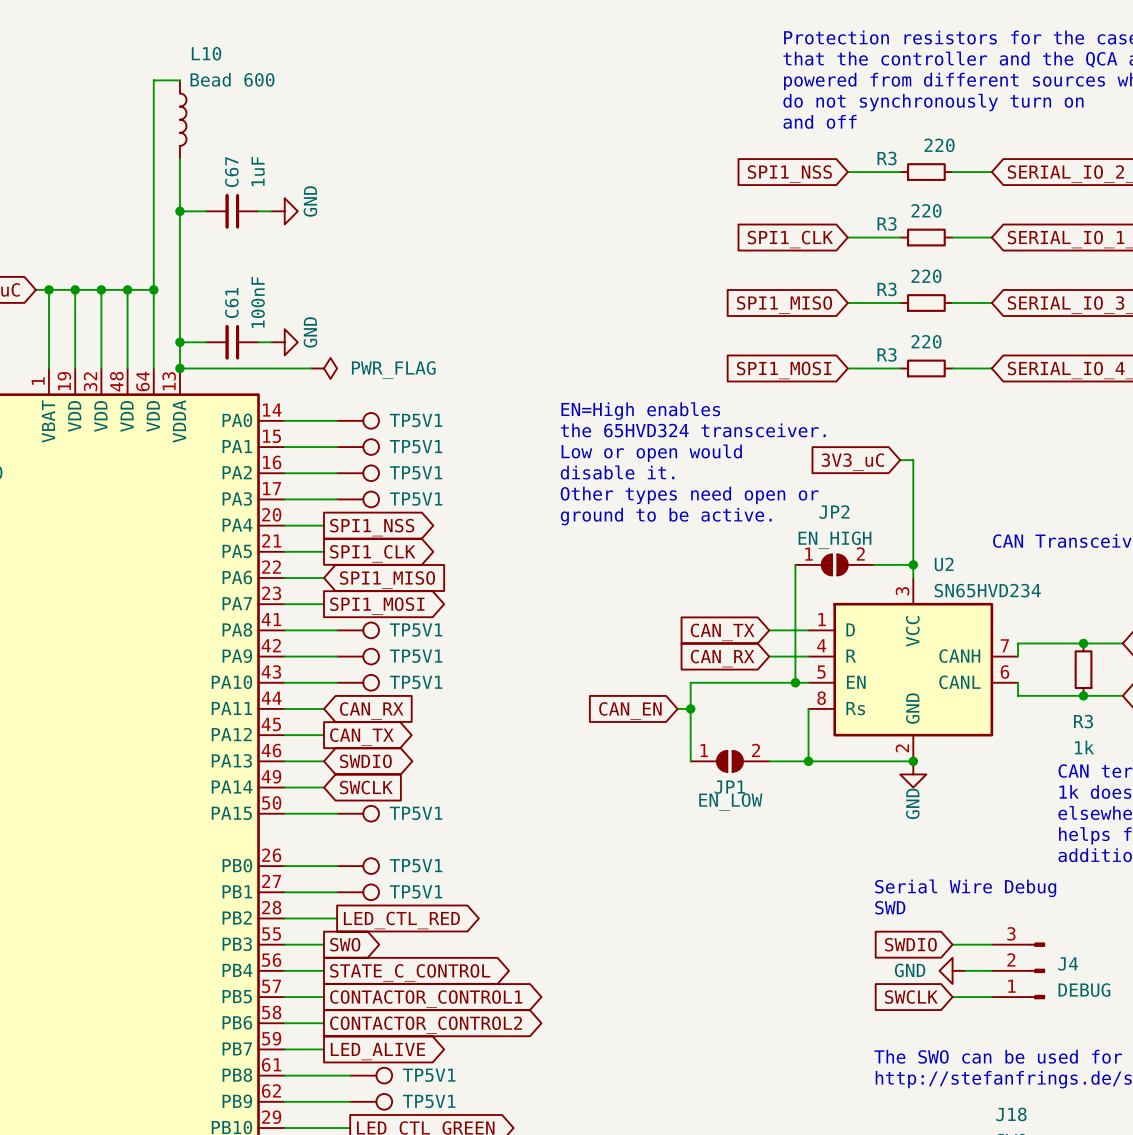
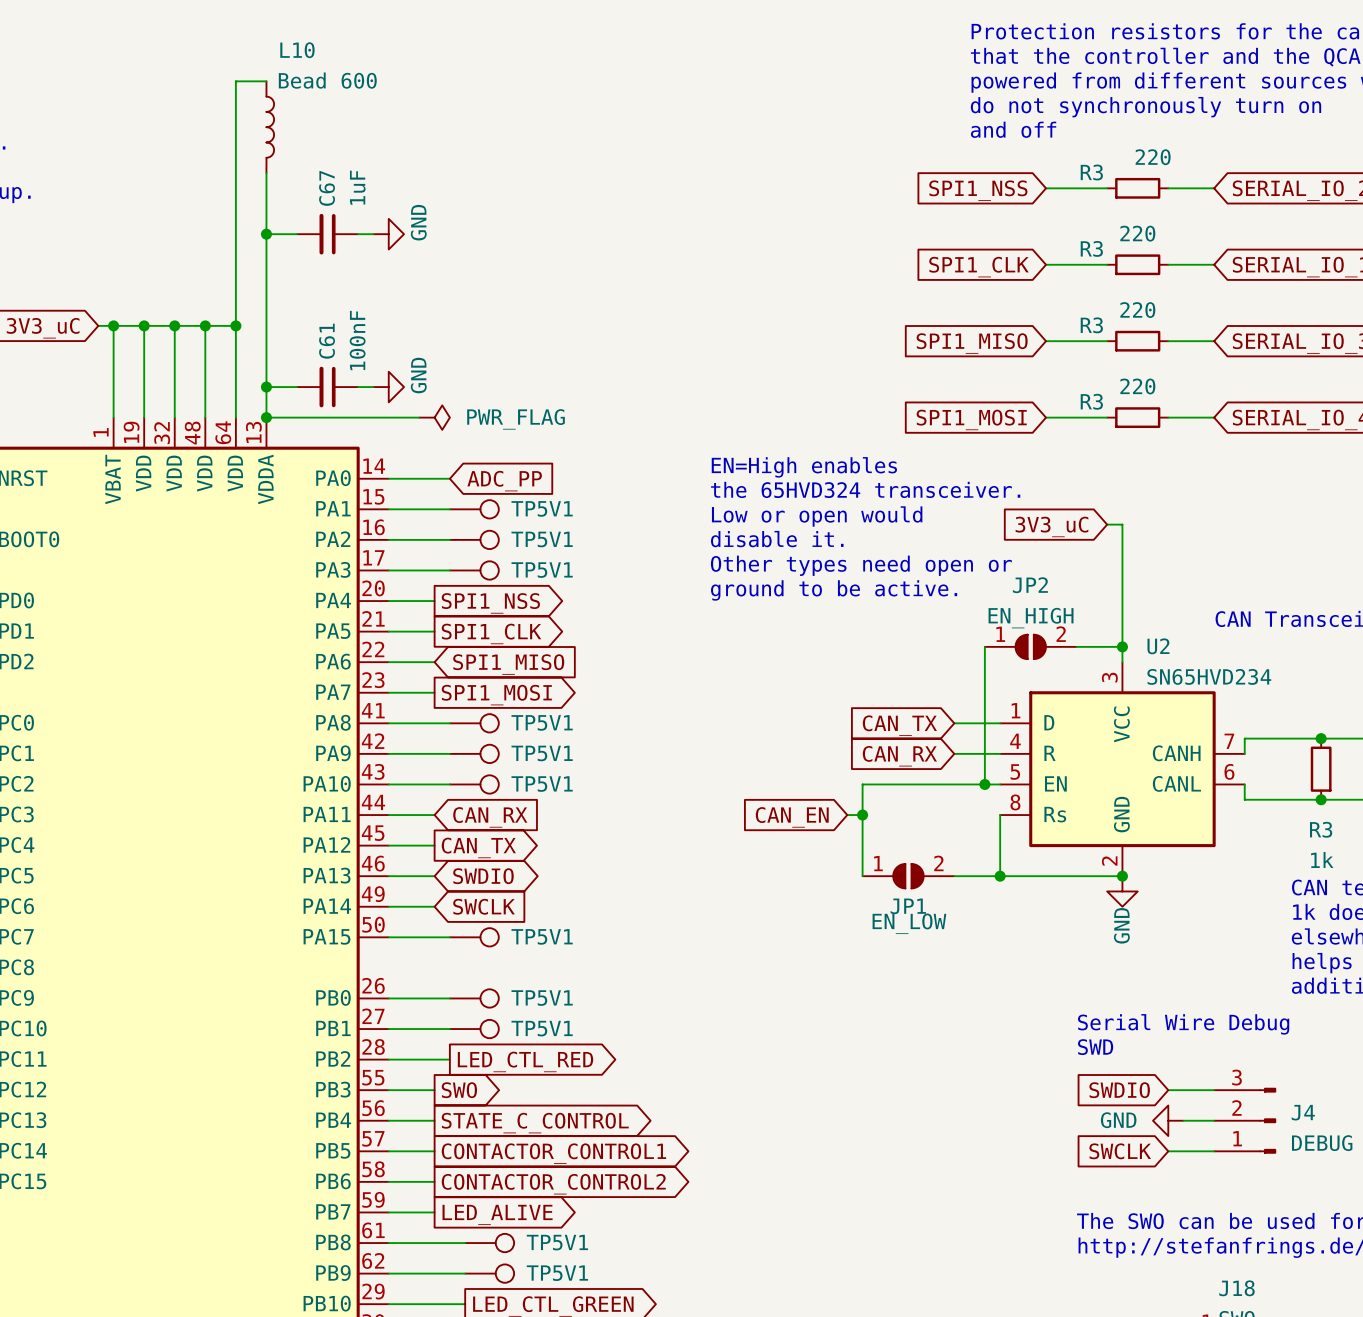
TP5V1: (358, 420) -> none
global label: none -> ADC_PP (504, 481)

